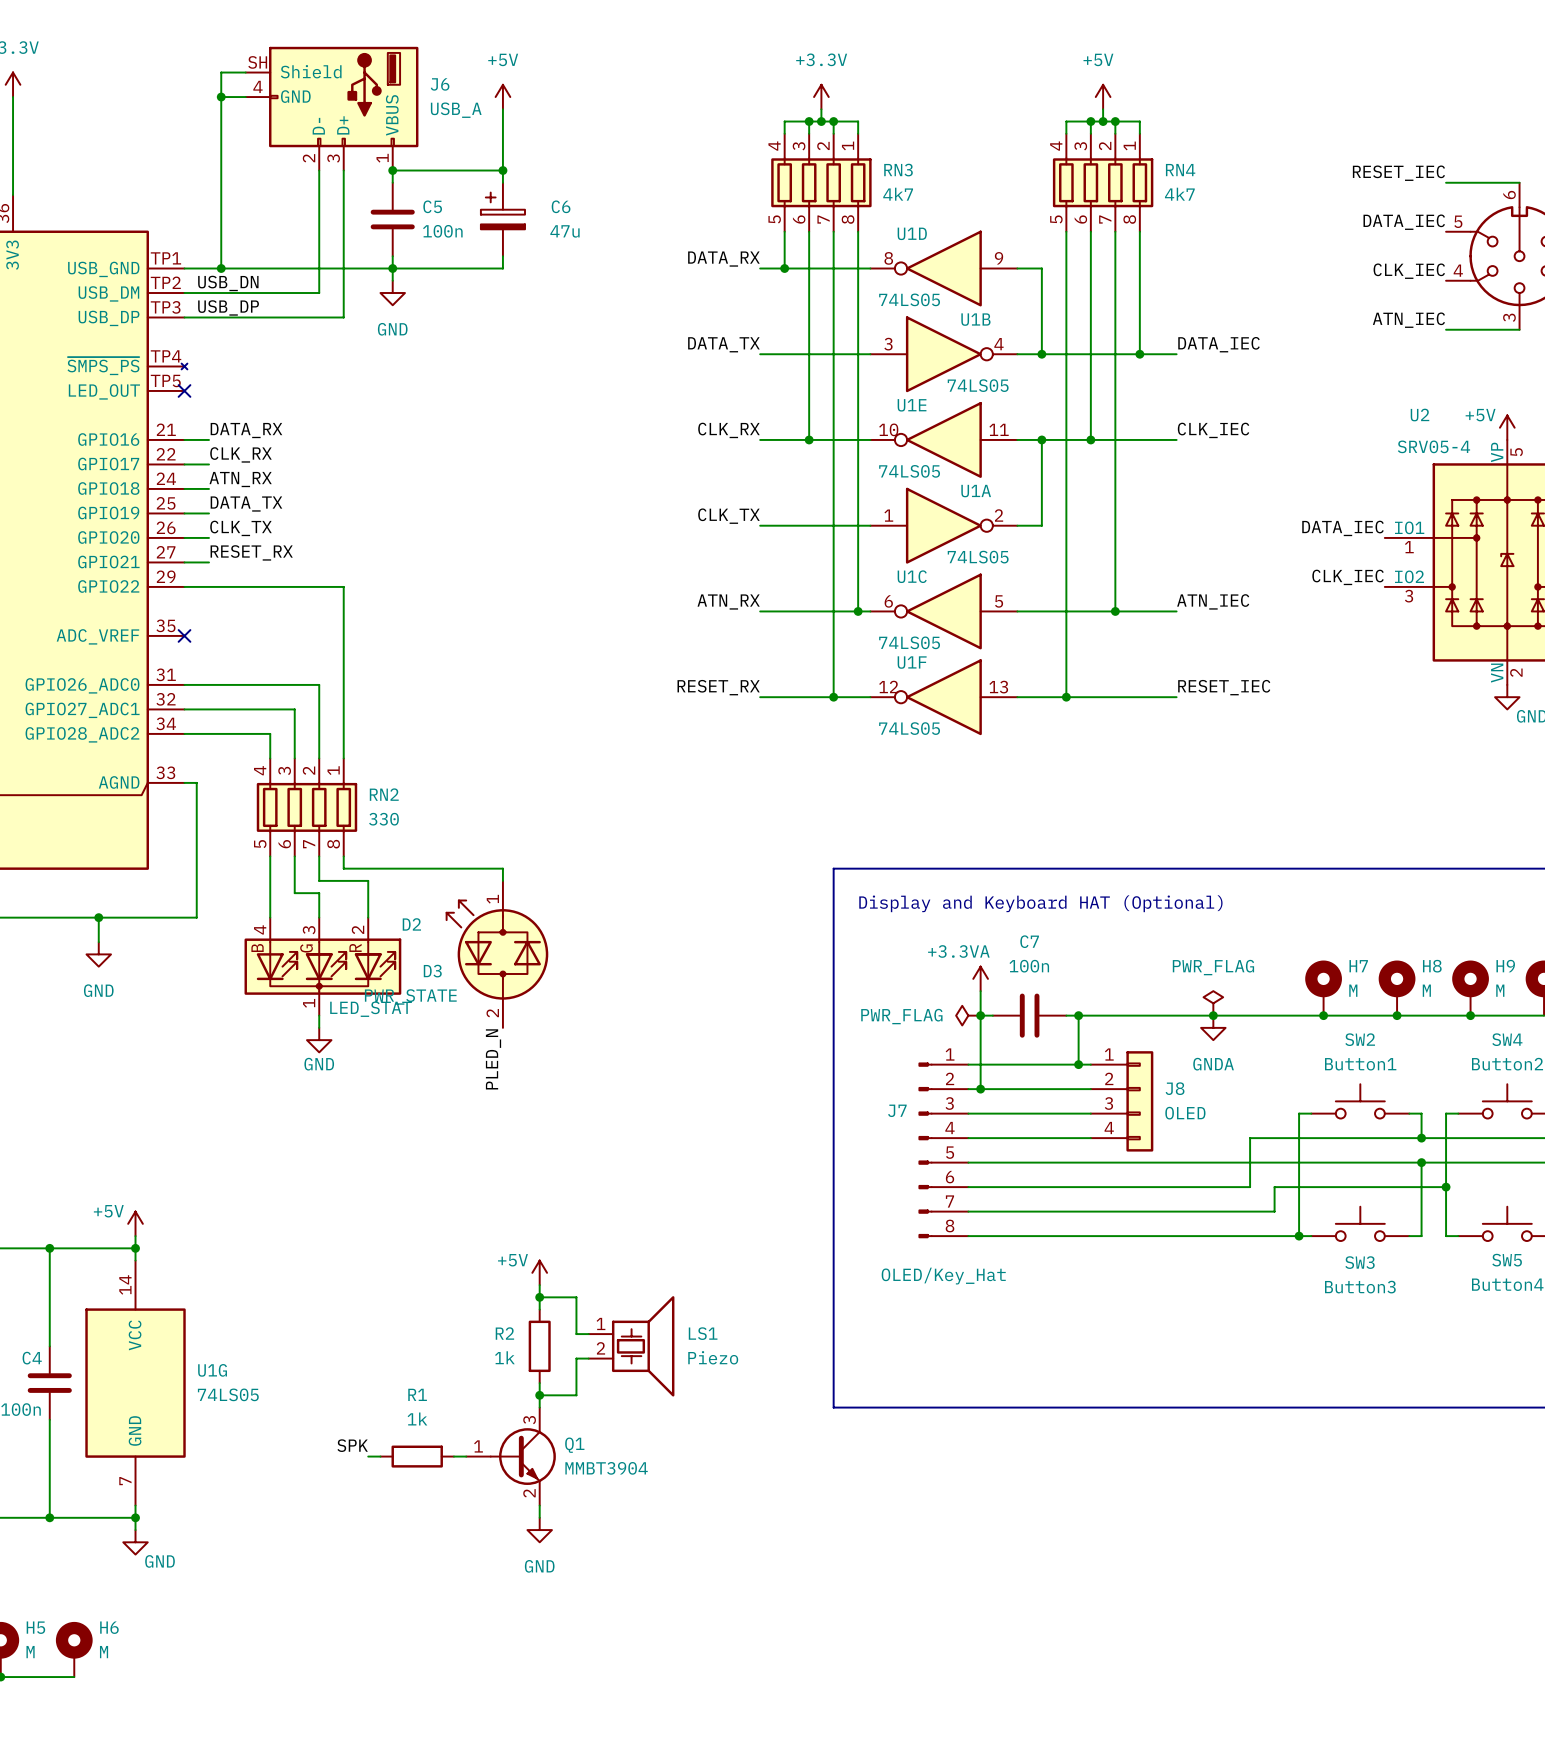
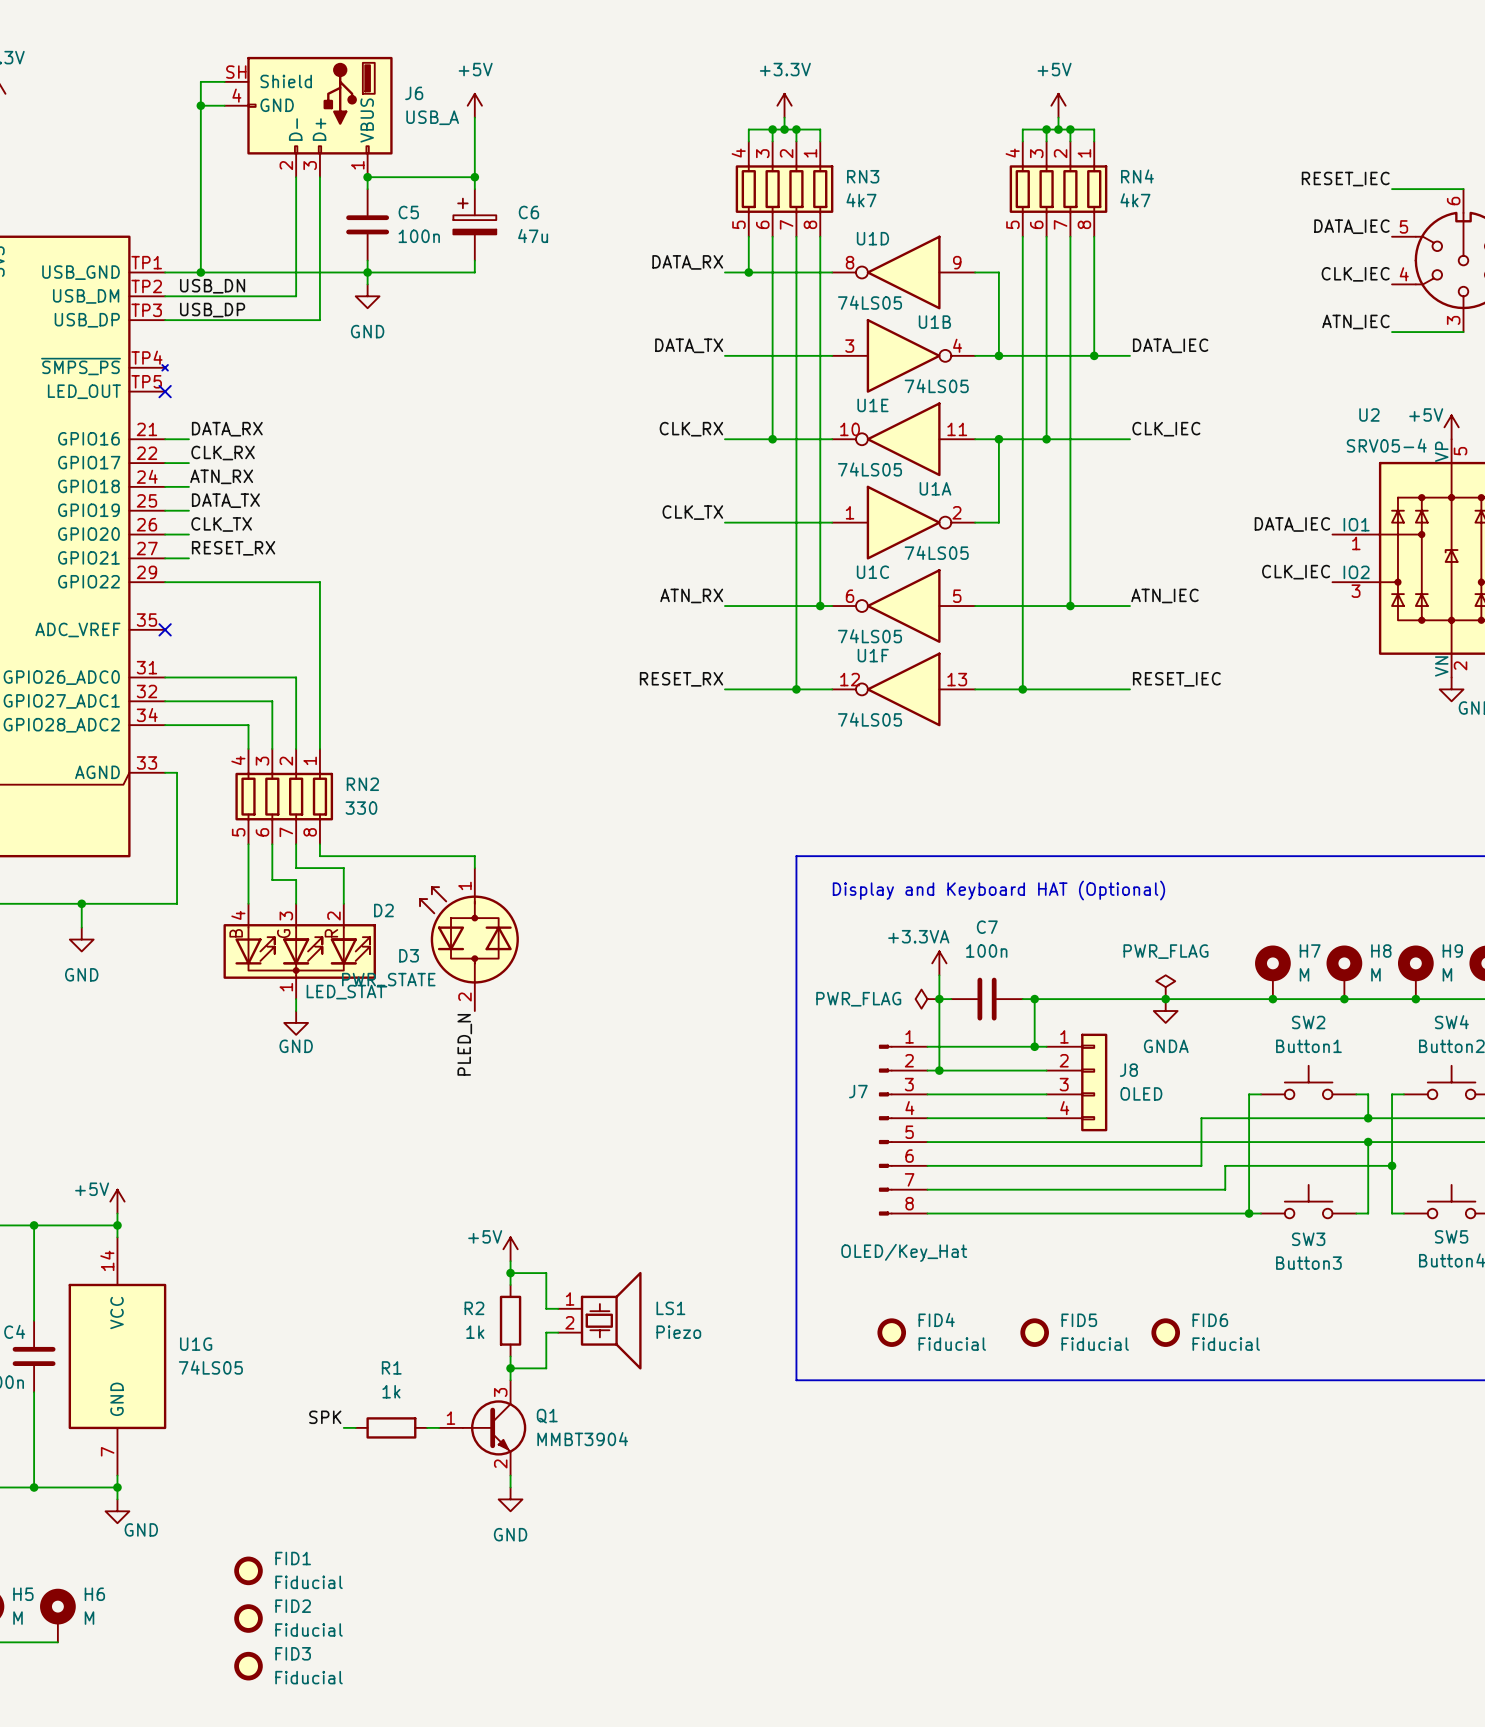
FID4: none -> Fiducial (891, 1332)
FID5: none -> Fiducial (1034, 1332)
FID6: none -> Fiducial (1165, 1332)
FID1: none -> Fiducial (248, 1570)
FID2: none -> Fiducial (248, 1618)
FID3: none -> Fiducial (248, 1666)

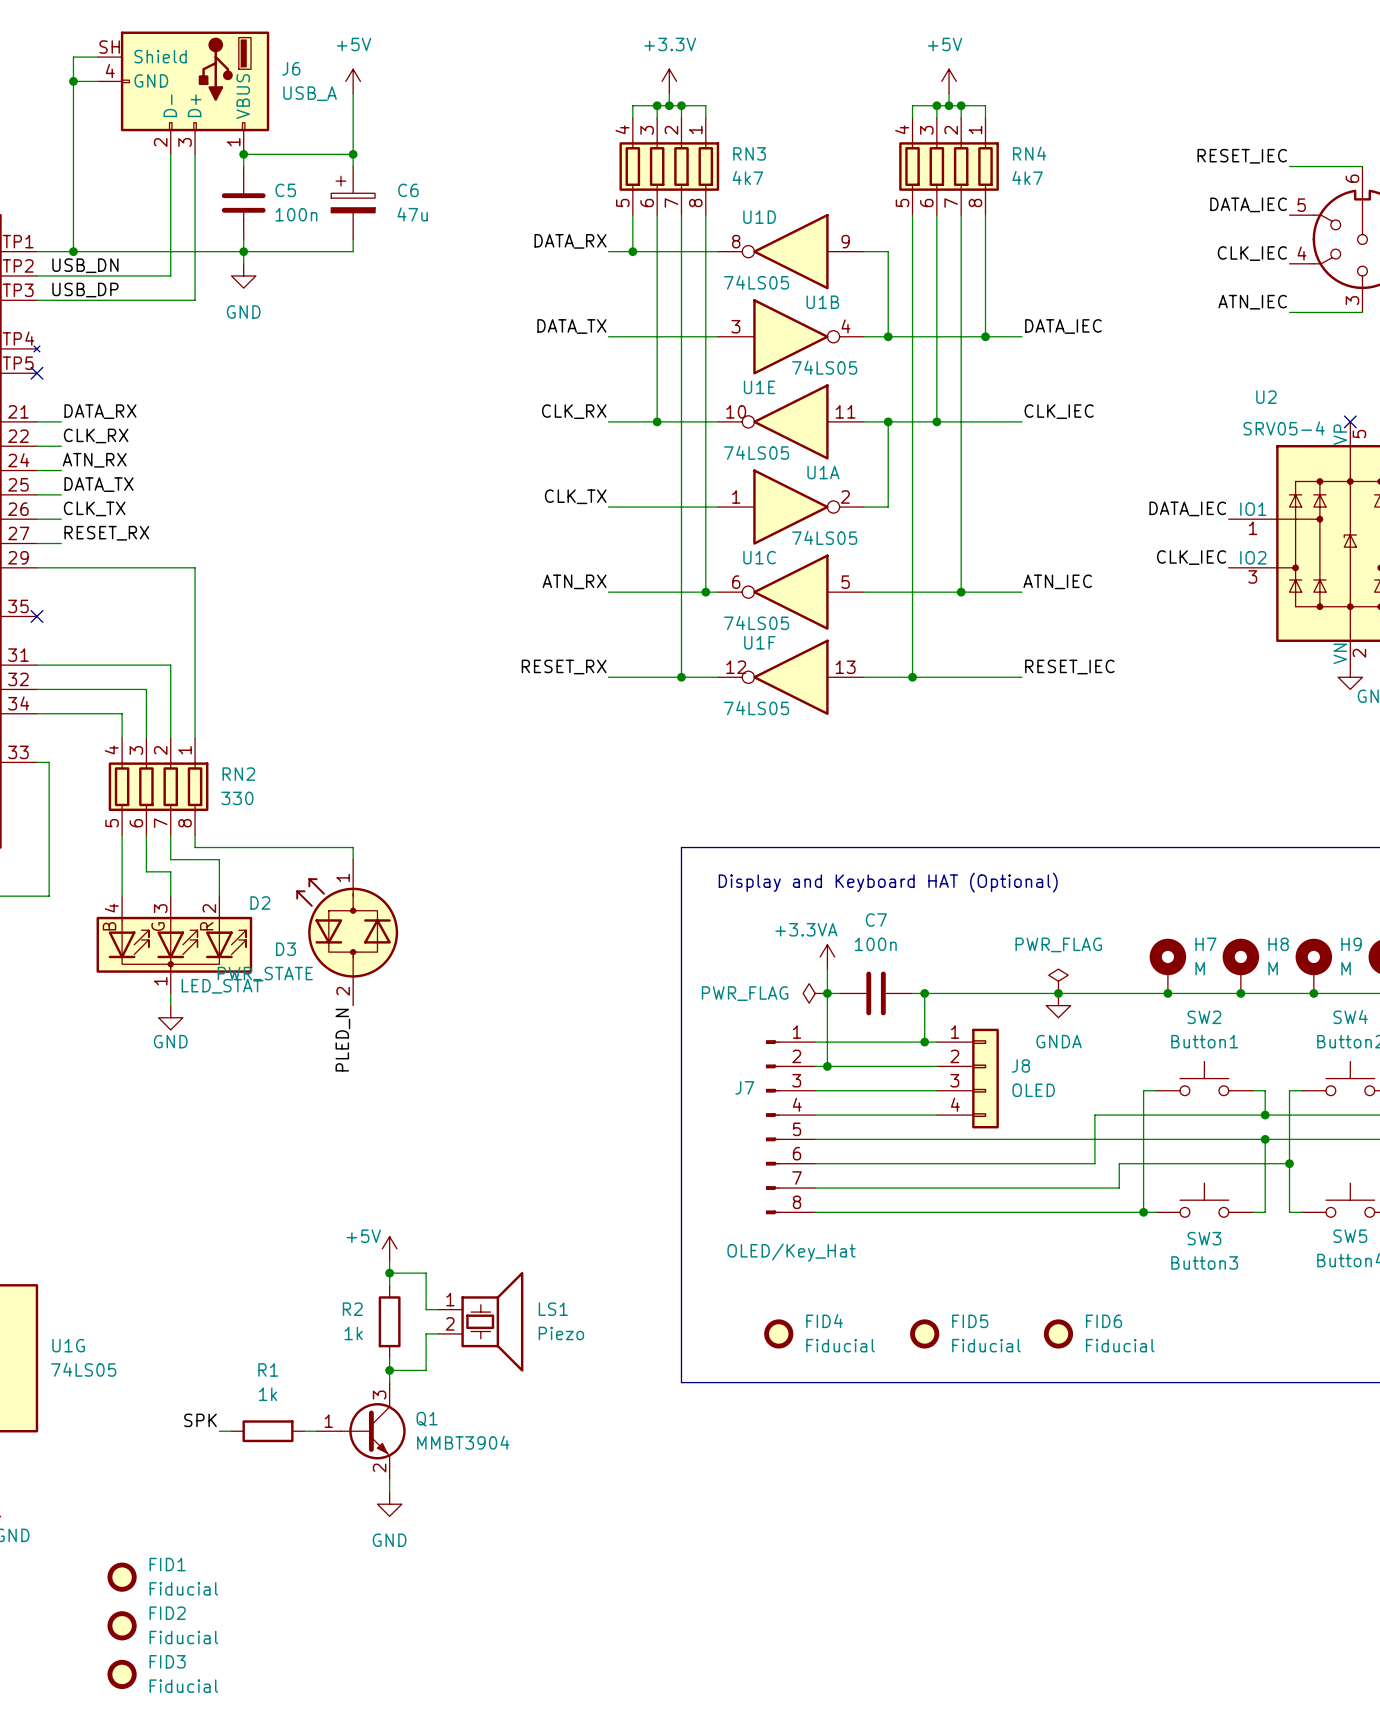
power symbol: +5V (1451, 427) -> none
no-connect mark: none -> (1350, 421)

